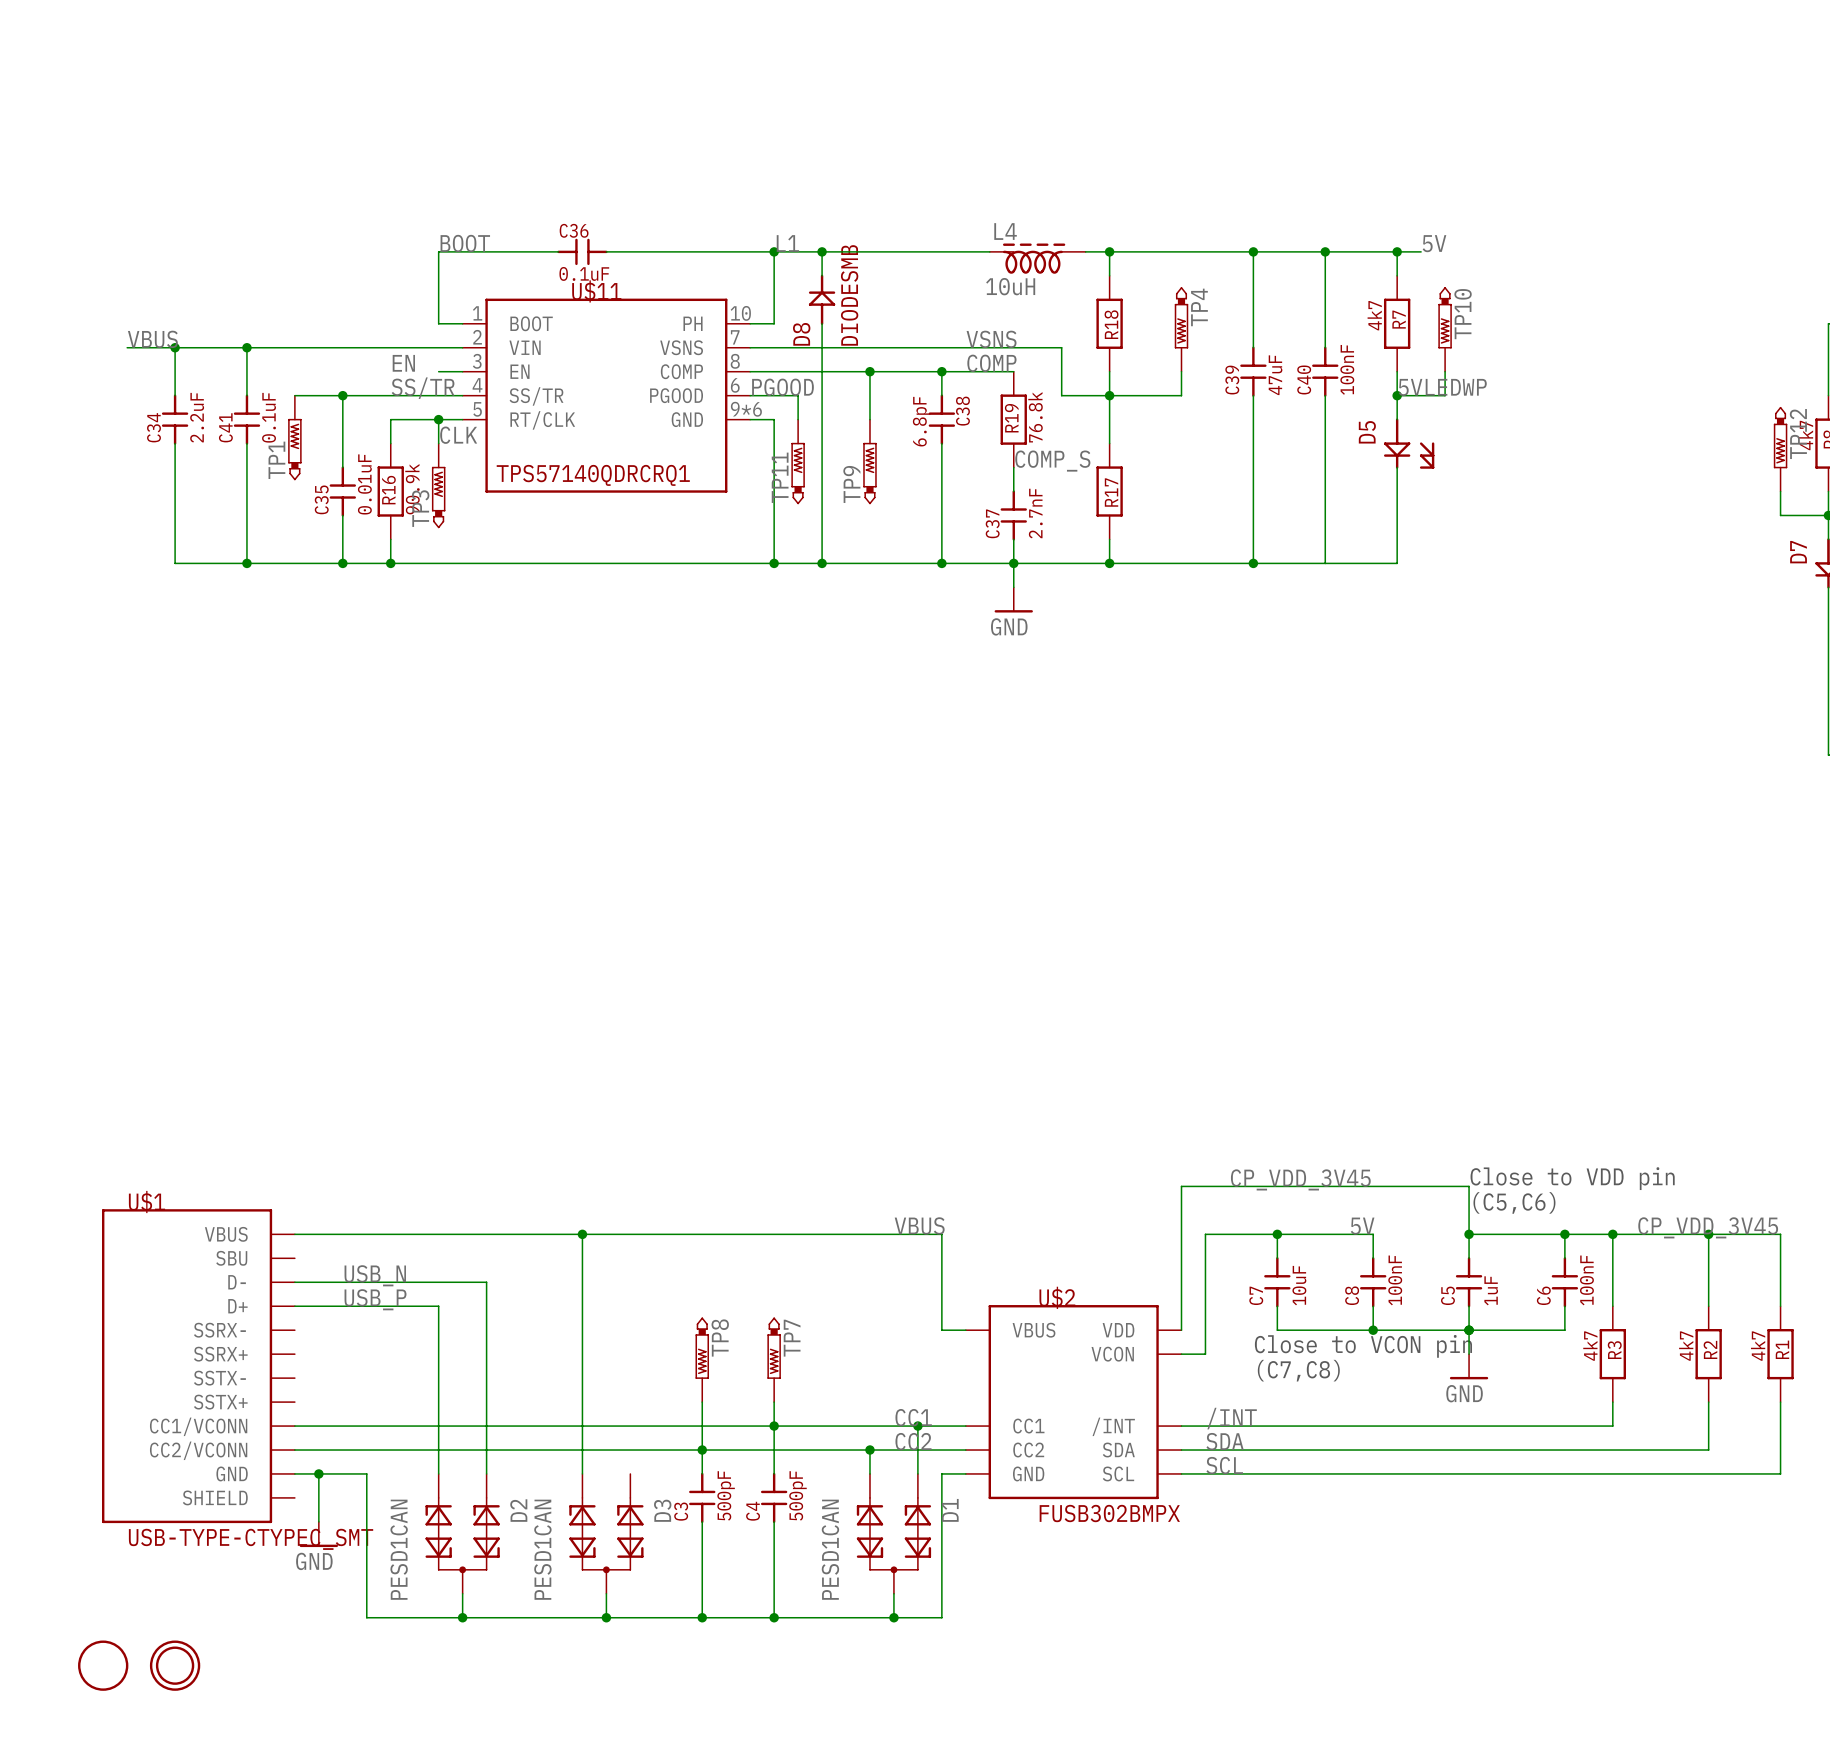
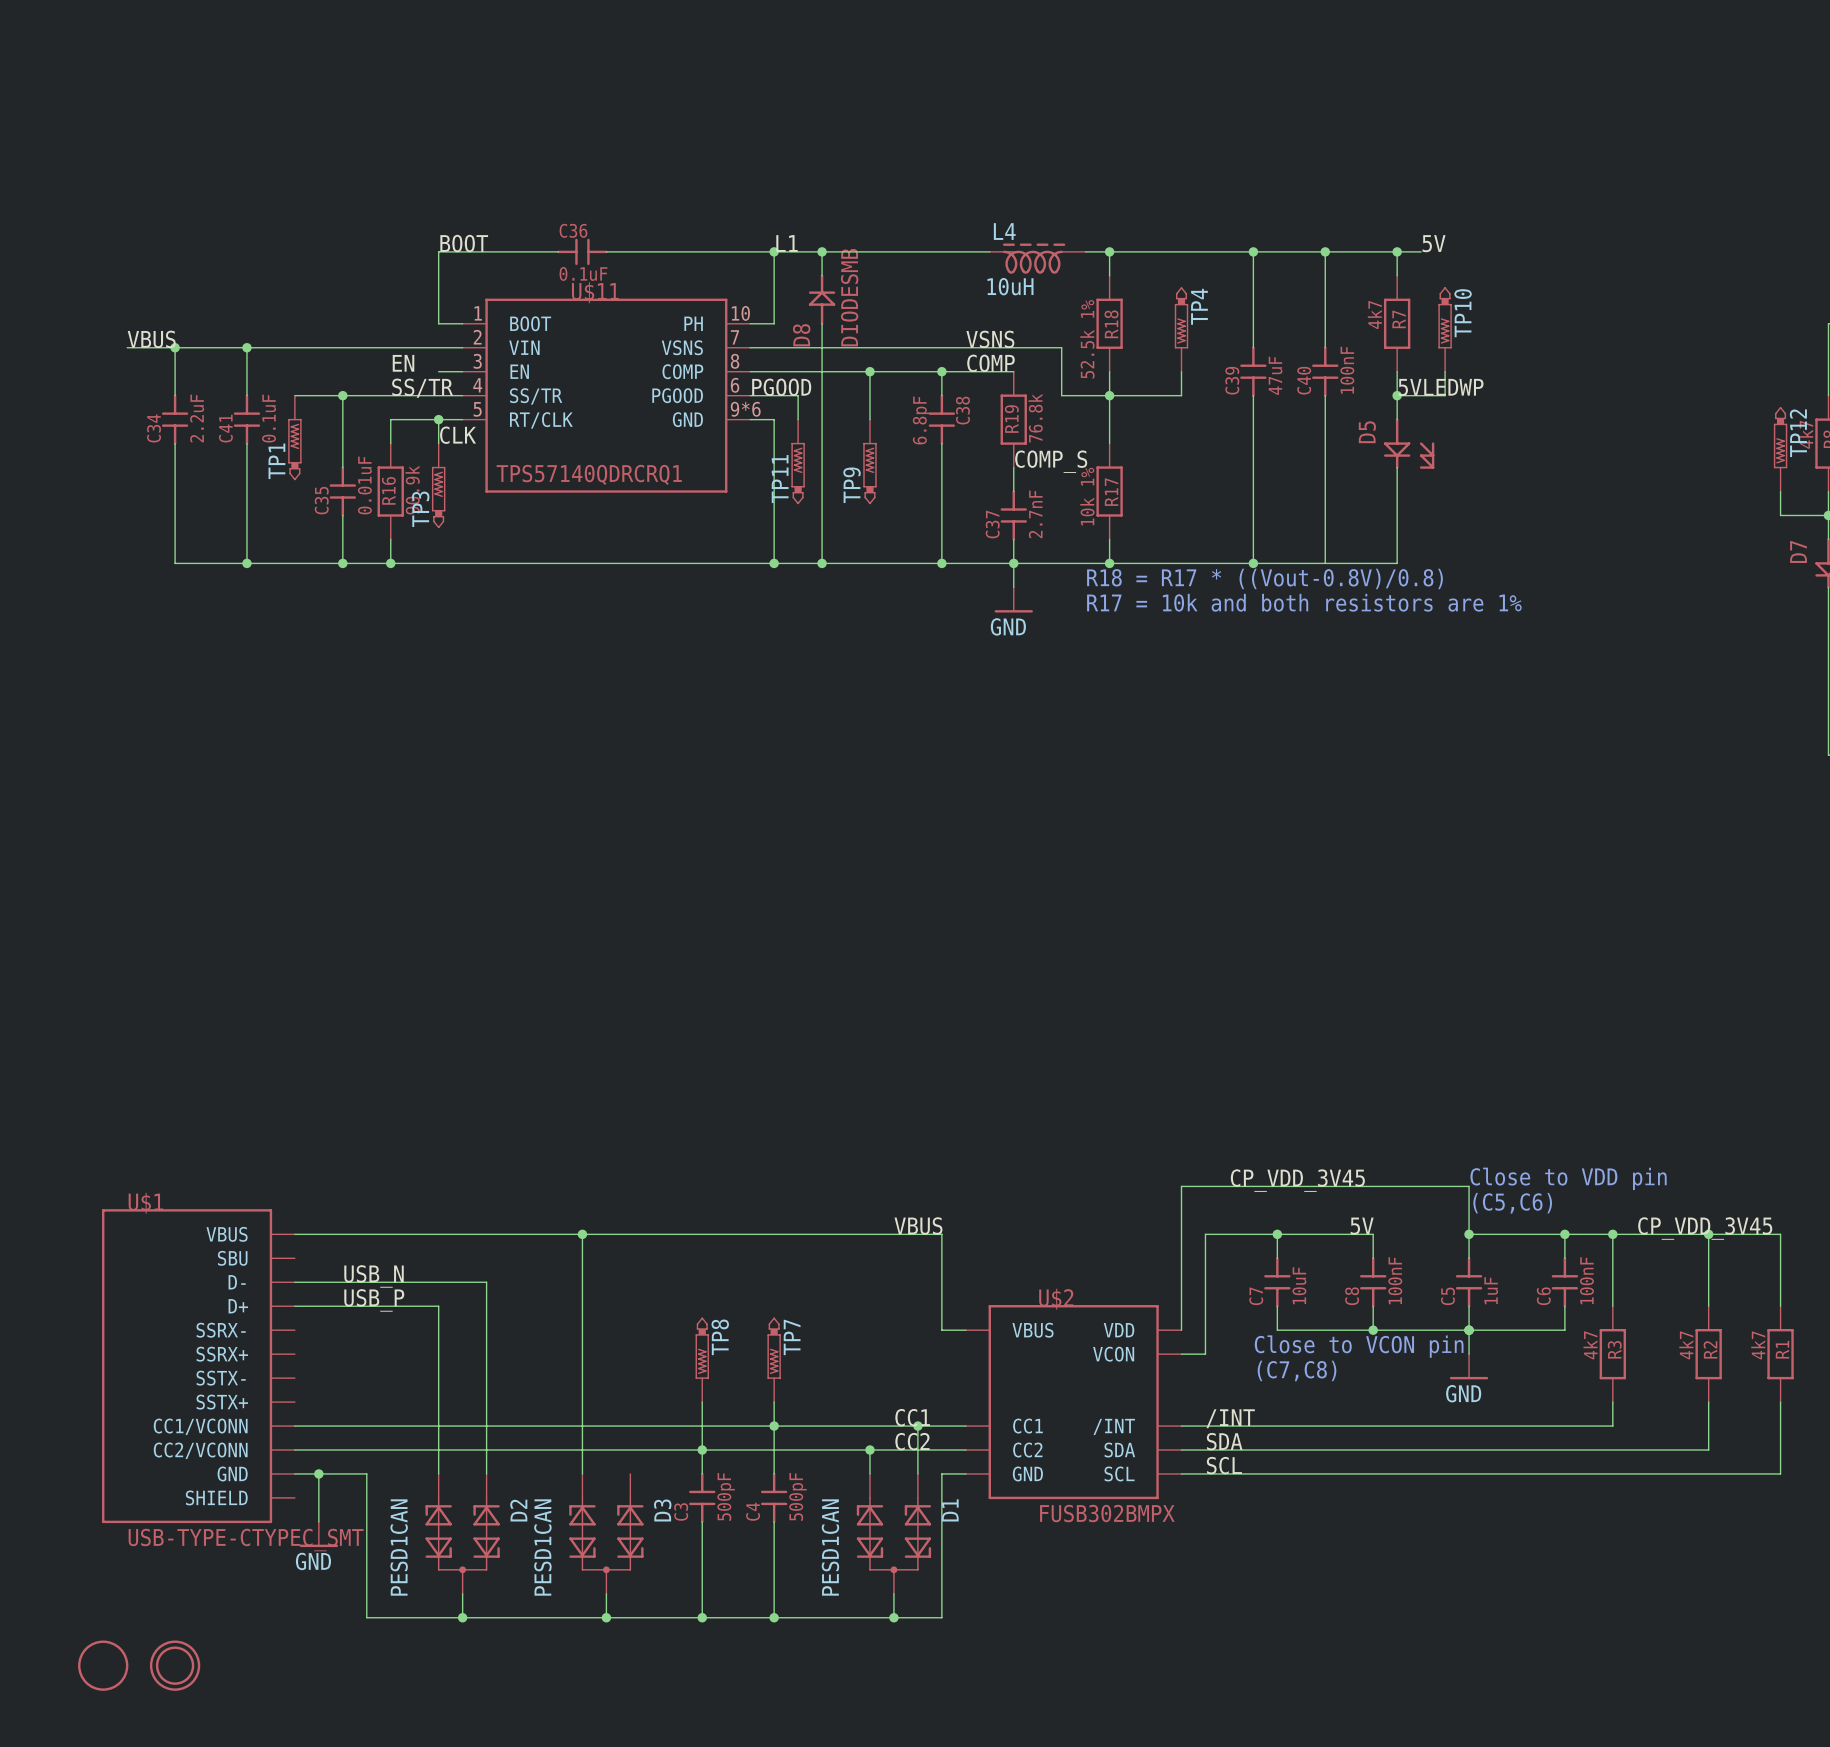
R18 value: none -> 52.5k 1% (1087, 339)
R17 value: none -> 10k 1% (1087, 496)
text: none -> R18 = R17 * ((Vout-0.8V)/0.8) (1264, 578)
text: none -> R17 = 10k and both resistors are 1% (1304, 602)

